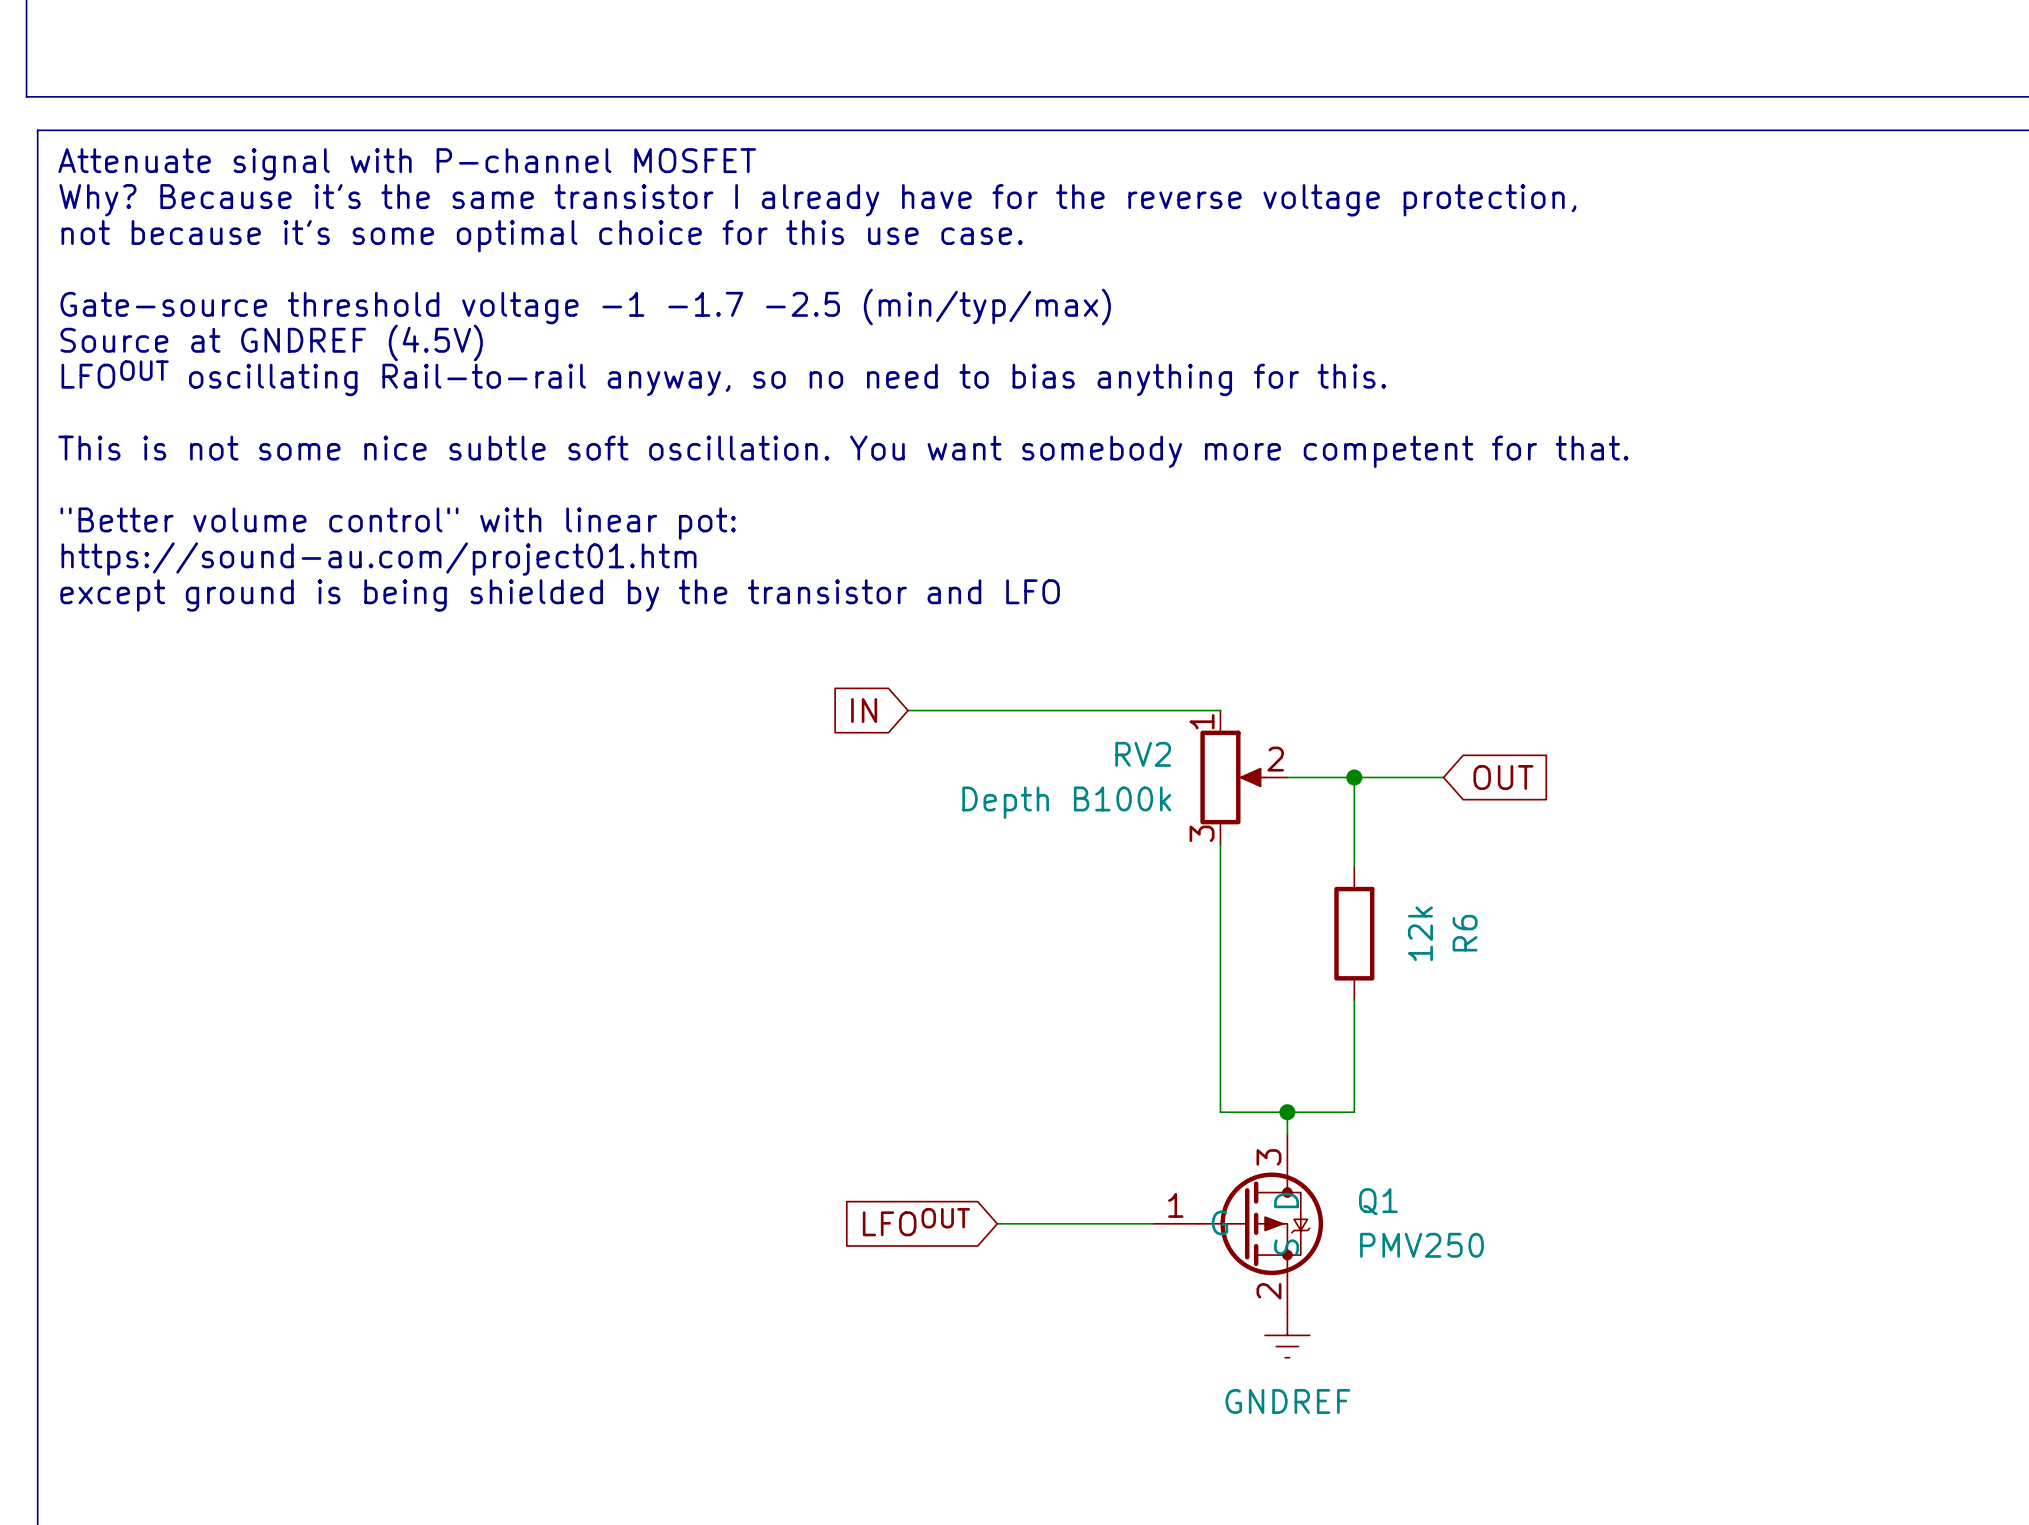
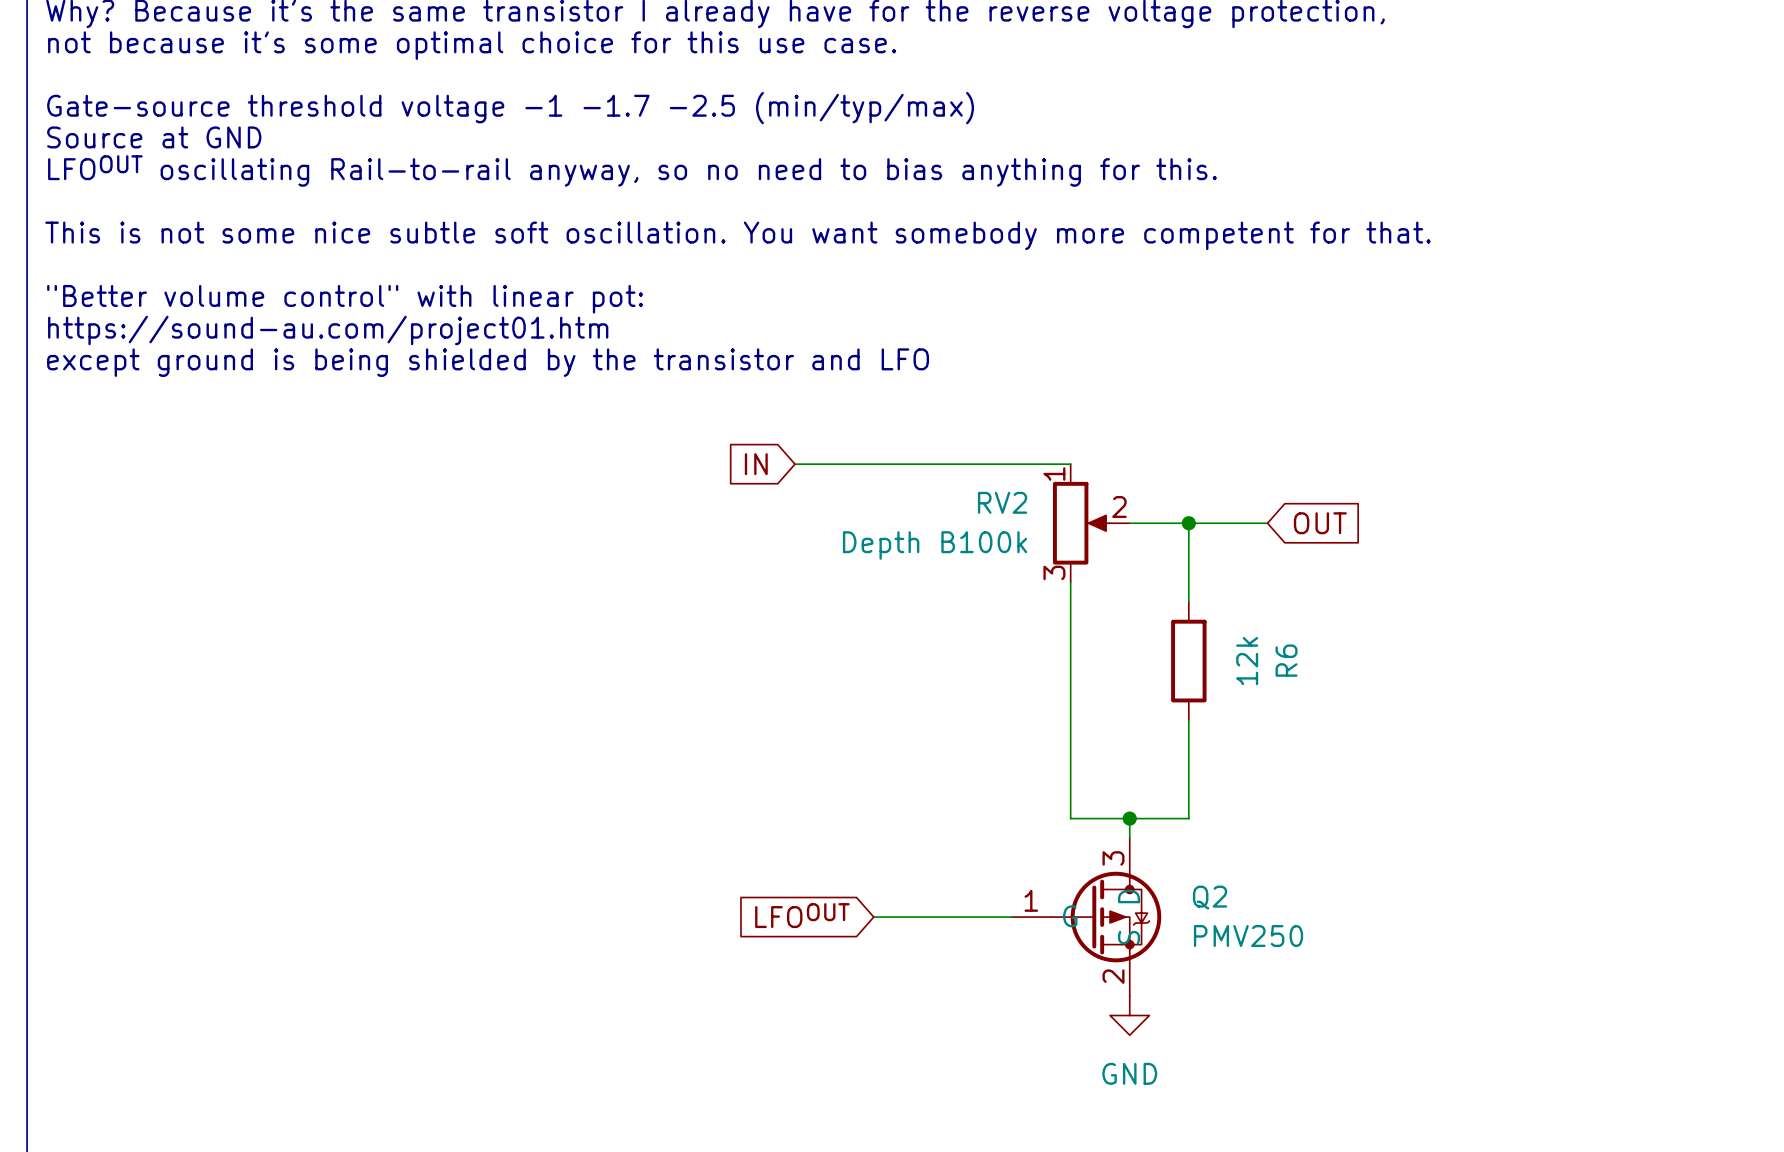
text: Source at GNDREF (4.5V) (271, 342) -> Source at GND (154, 137)
Q1 name: Q1 (1378, 1201) -> Q2 (1210, 897)
power symbol: GNDREF (1287, 1335) -> GND (1129, 1015)

